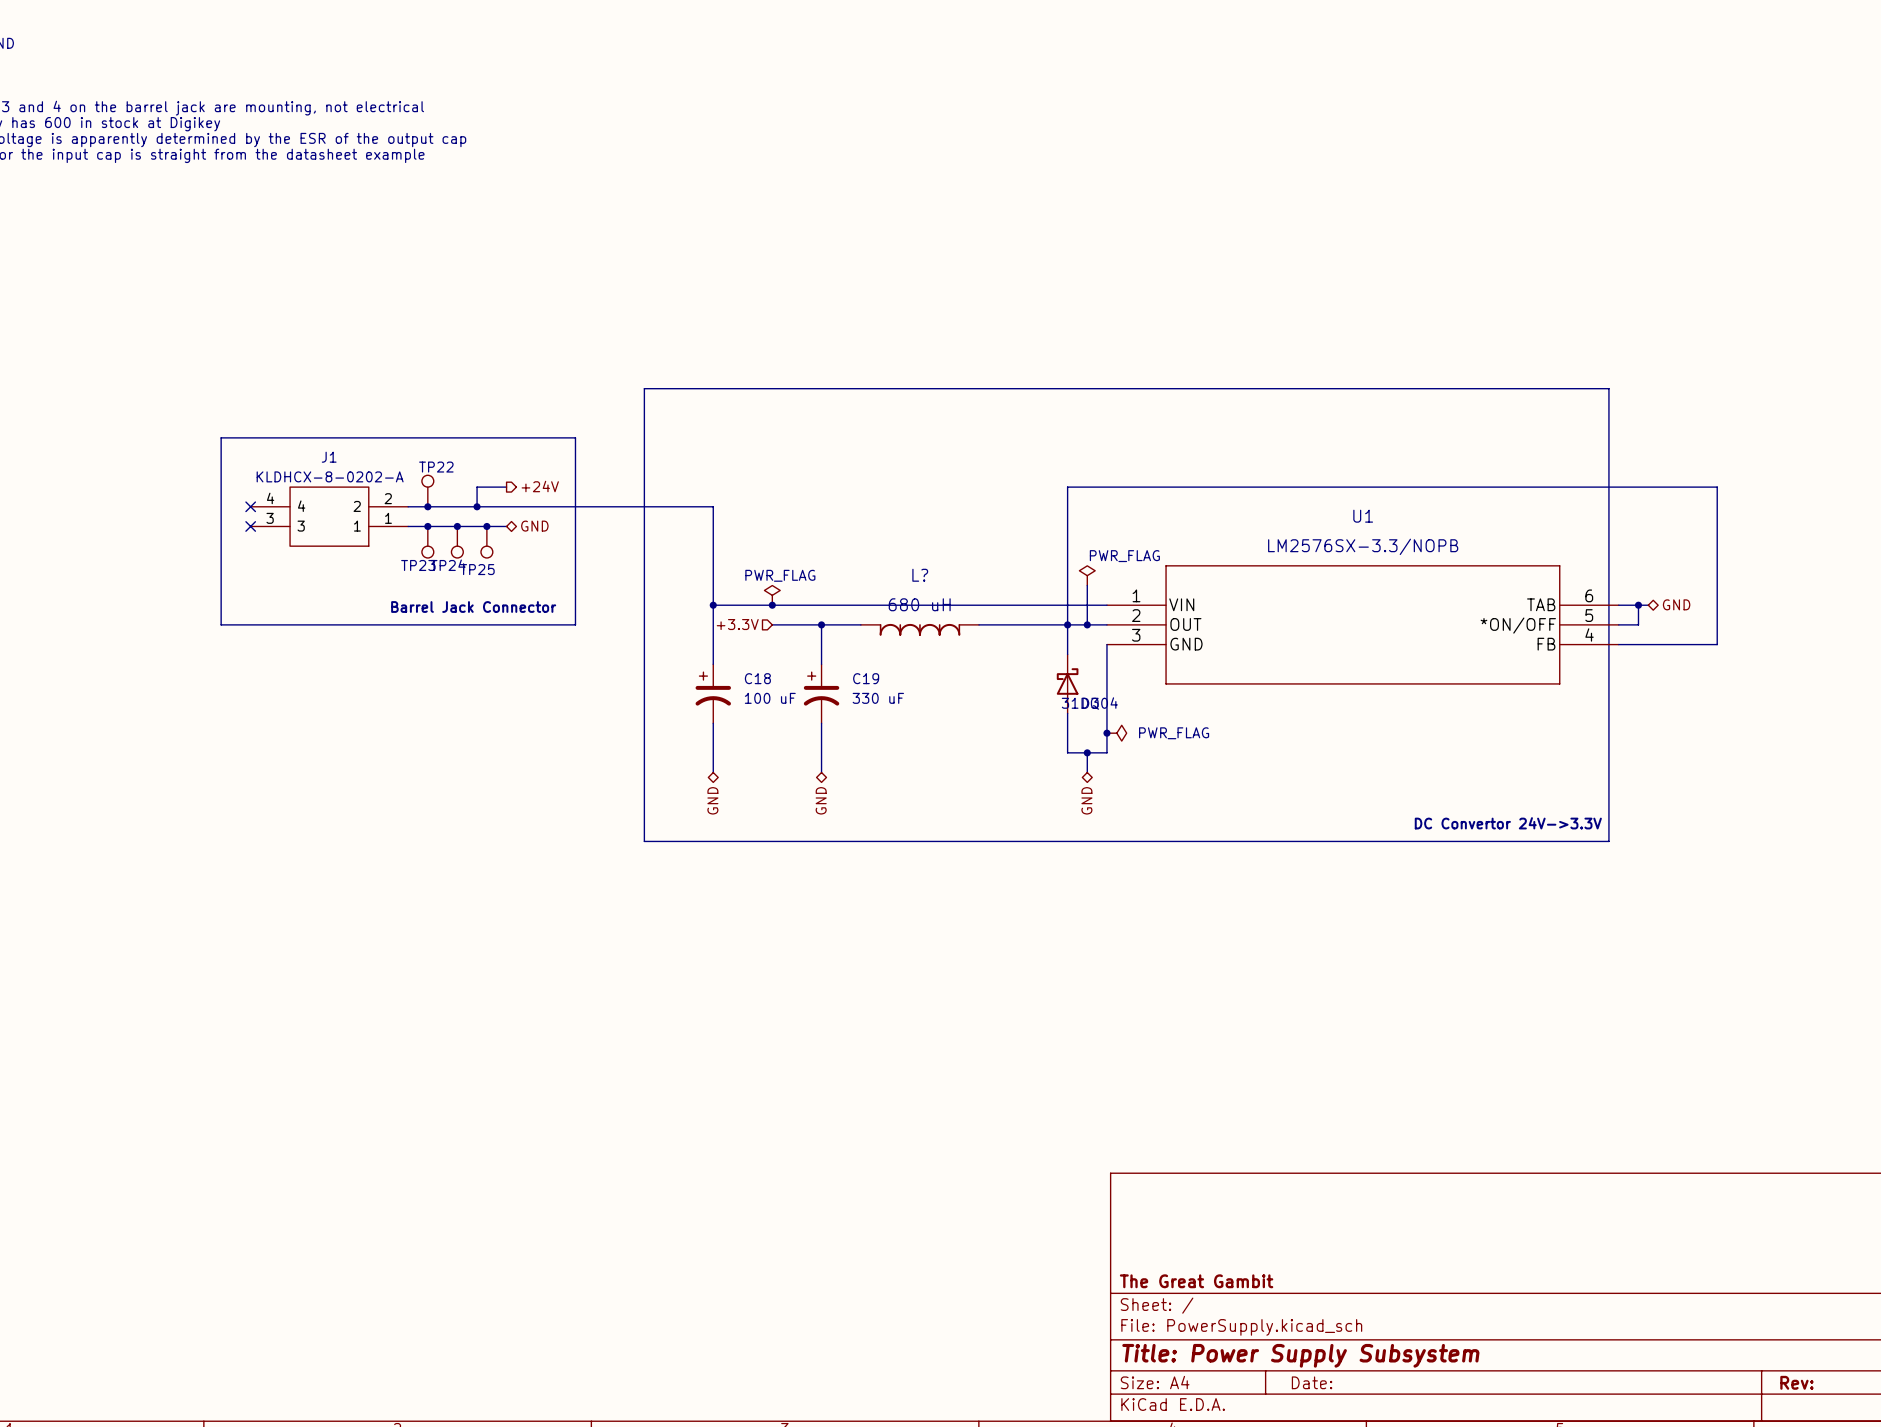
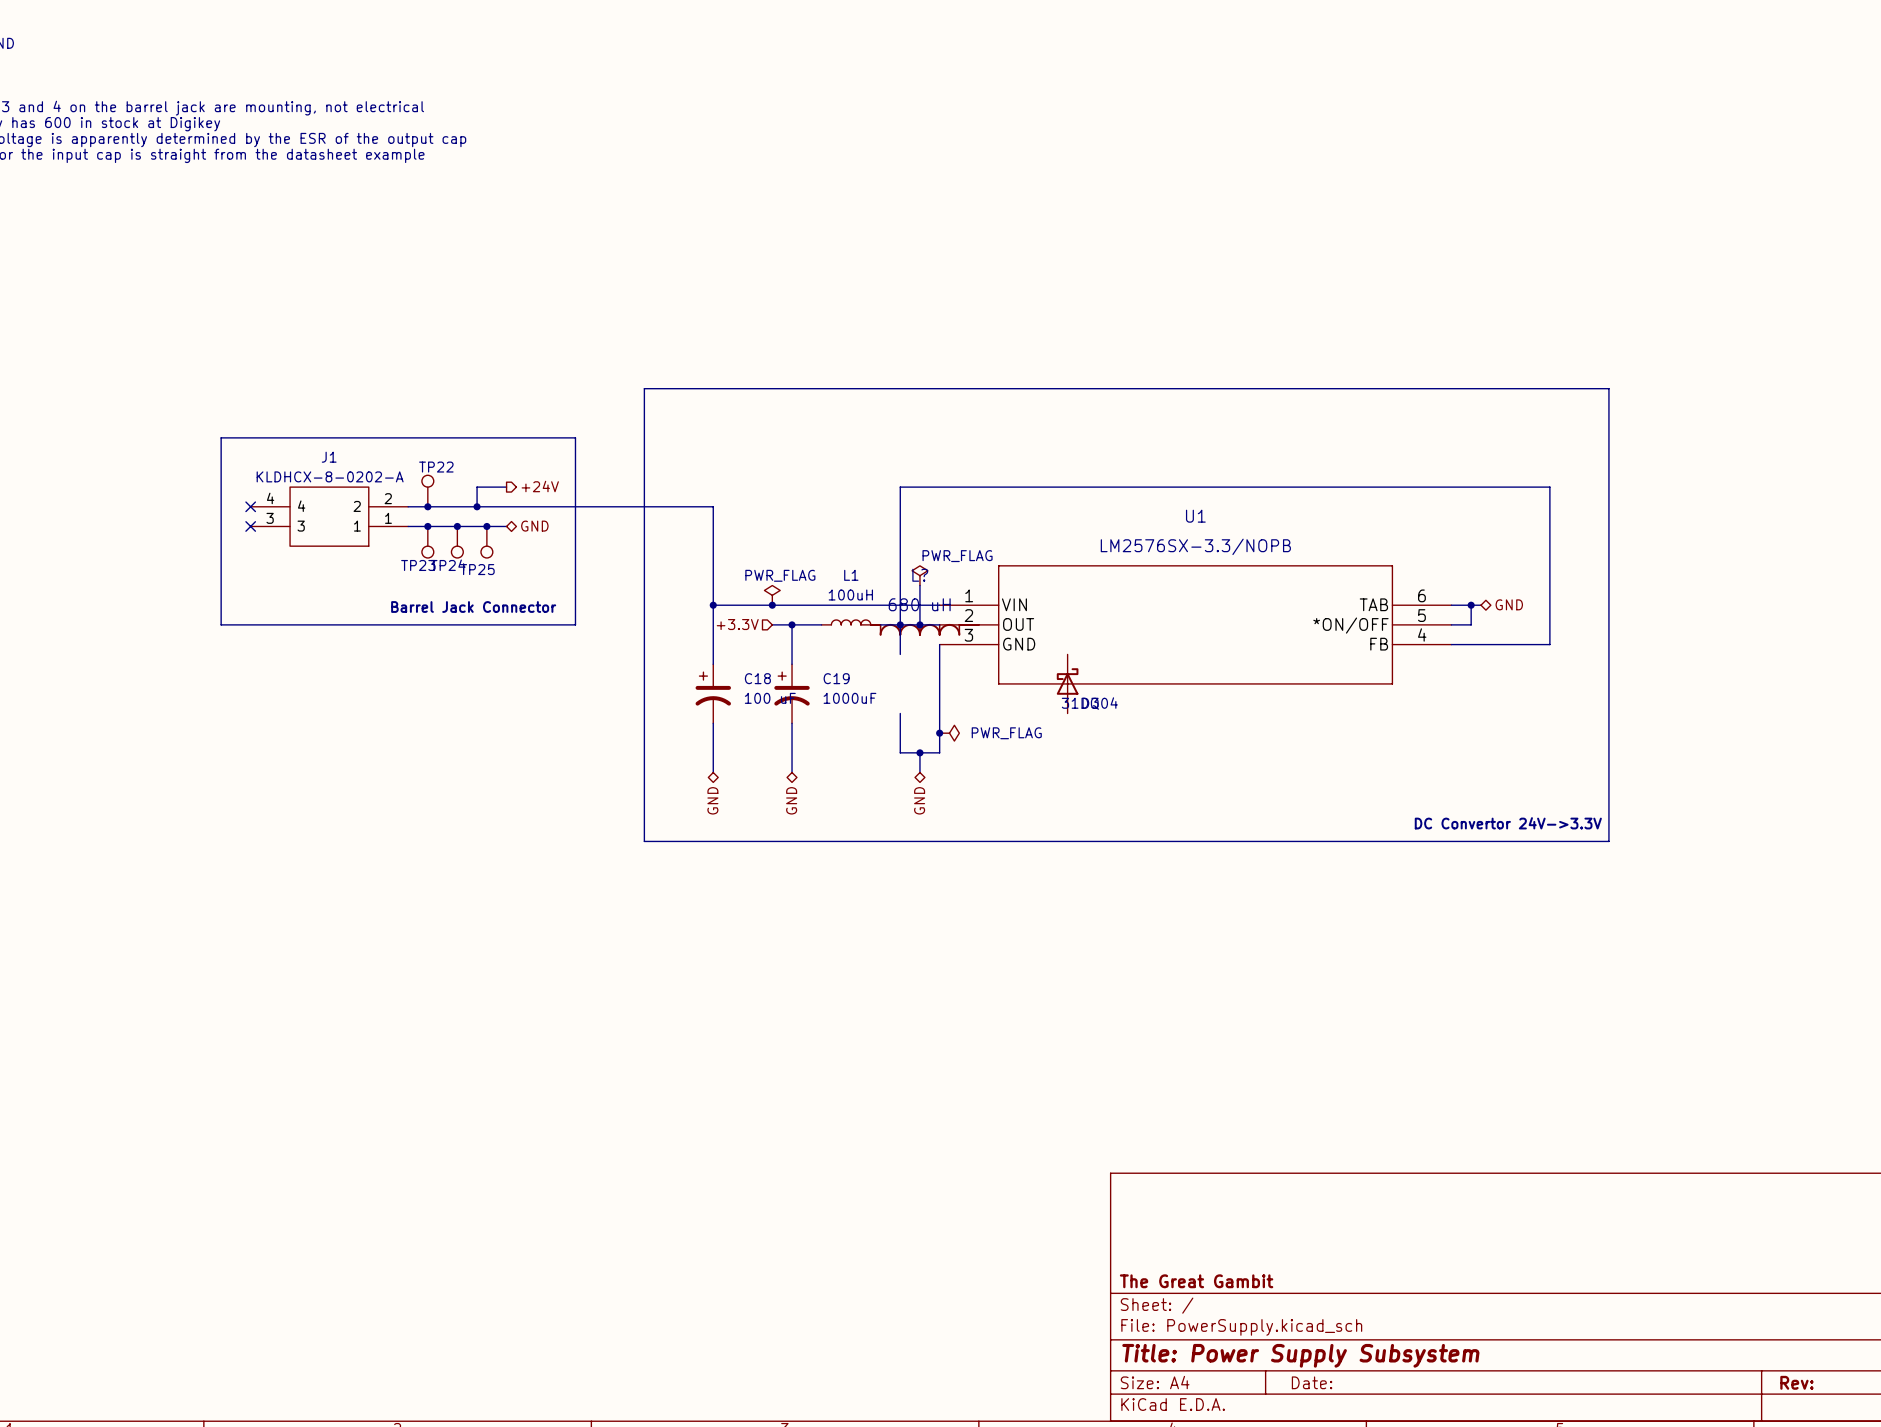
wire: (1067, 487) (1067, 654) -> (1067, 487) (900, 487) (900, 654)
wire: (1549, 487) (1717, 487) (1717, 644) (1618, 644) -> (1549, 487) (1549, 644) (1451, 644)
power symbol: none -> PWR_FLAG (919, 575)
power symbol: PWR_FLAG (1087, 575) -> none
wire: (1087, 585) (1087, 624) -> (919, 585) (919, 624)
hierarchical label position: GND (1676, 604) -> GND (1509, 604)
wire: (939, 605) (1106, 605) -> none
junction: none -> (1471, 605)
wire: (1618, 605) (1648, 605) -> (1451, 605) (1481, 605)
wire: (1638, 605) (1638, 624) (1618, 624) -> (1471, 605) (1471, 624) (1451, 624)
junction: (1638, 605) -> none
L1: none -> 100uH (851, 622)
wire: none -> (792, 624) (792, 664)
junction position: (821, 624) -> (792, 624)
wire: (860, 624) (821, 624) (821, 664) -> none
wire: none -> (880, 624) (939, 624)
junction: none -> (900, 624)
junction: none -> (919, 624)
wire: (979, 624) (1106, 624) -> none
junction: (1067, 624) -> none
junction: (1087, 624) -> none
U1 position: (1362, 624) -> (1195, 624)
wire: (1106, 644) (1106, 752) (1067, 752) (1067, 713) -> (939, 644) (939, 752) (900, 752) (900, 713)
C19 position: (821, 693) -> (792, 693)
C19 value: 330 uF (878, 698) -> 1000uF (849, 698)
wire: (821, 723) (821, 772) -> (792, 723) (792, 772)
junction: none -> (939, 733)
power symbol: none -> PWR_FLAG (949, 733)
junction: (1106, 733) -> none
power symbol: PWR_FLAG (1116, 733) -> none
junction: none -> (919, 752)
wire: (1087, 752) (1087, 772) -> (919, 752) (919, 772)
junction: (1087, 752) -> none
hierarchical label position: GND (821, 800) -> GND (791, 800)
hierarchical label: none -> GND (919, 800)
hierarchical label: GND (1086, 800) -> none

